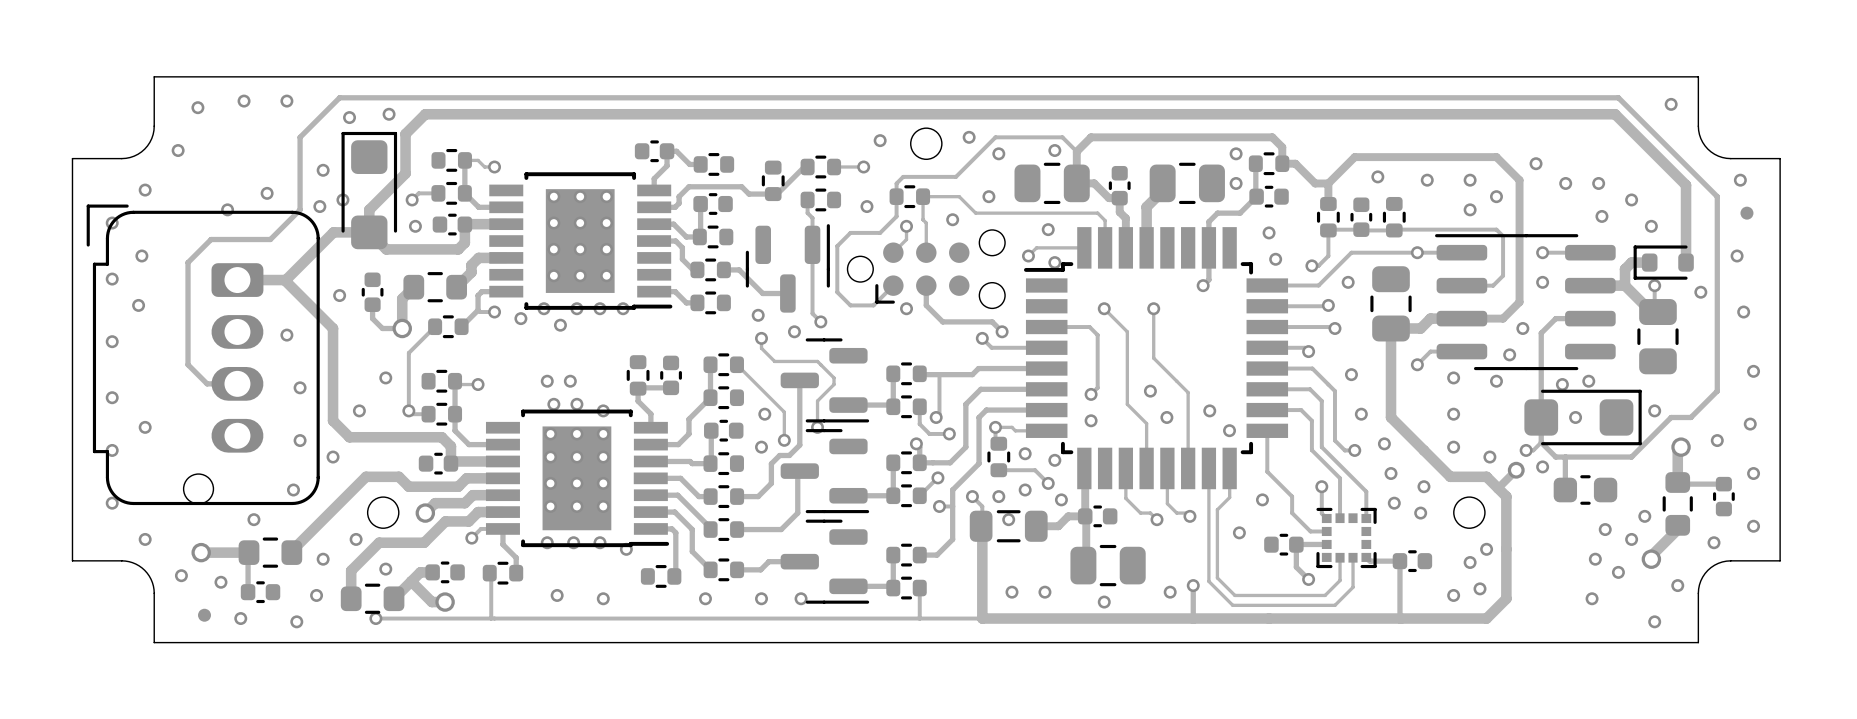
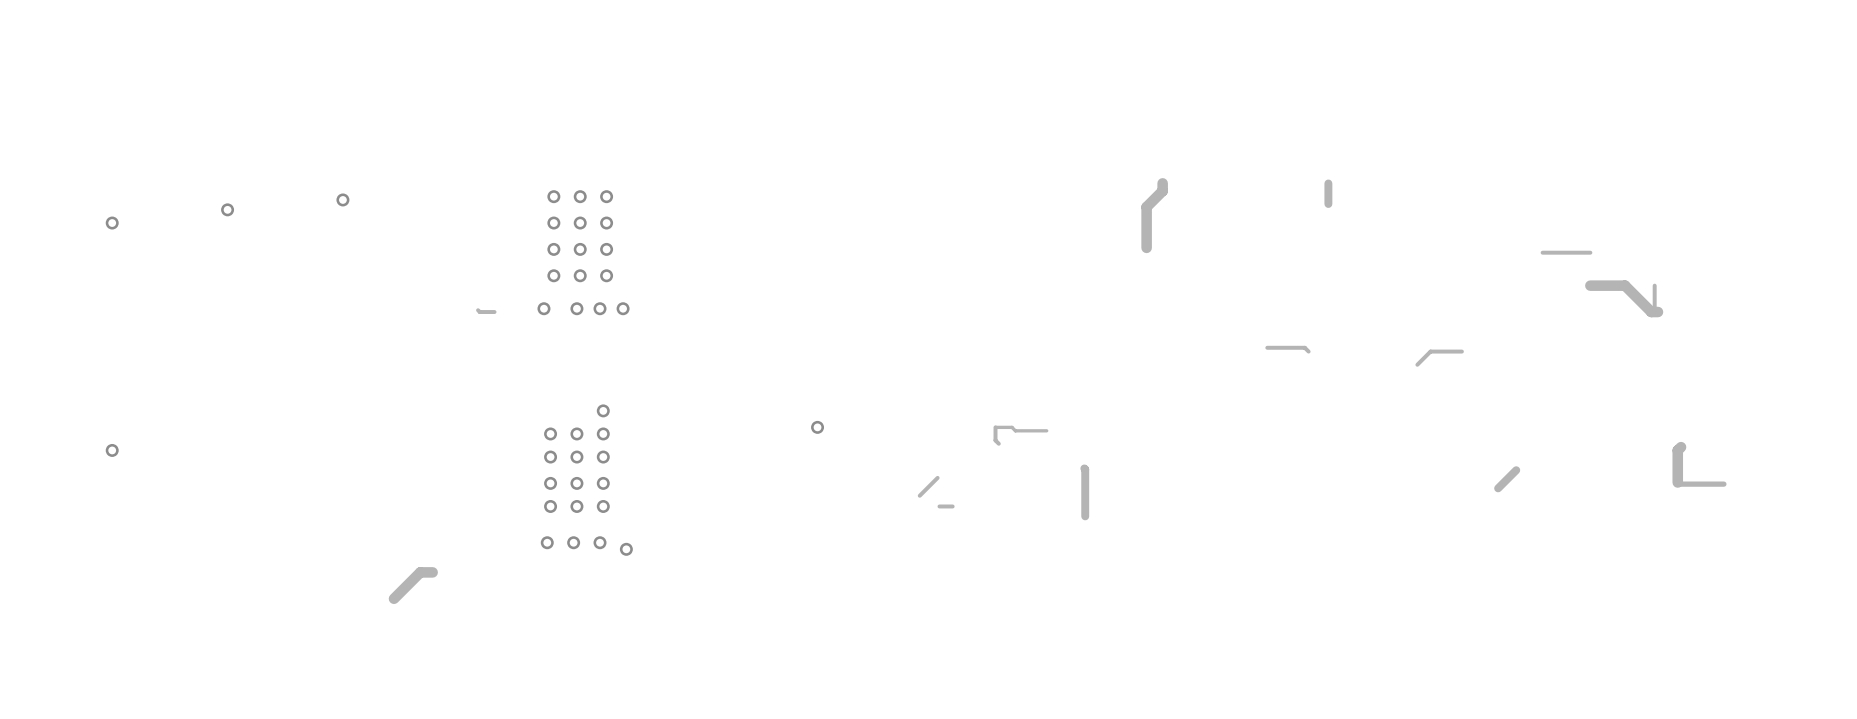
board edge: (1698, 76) (1698, 130) (1702, 142) (1707, 149) (1714, 154) (1726, 158) (1780, 158) (1780, 560) (1726, 561) (1714, 565) (1707, 570) (1702, 577) (1698, 589) (1698, 642) (154, 642) (154, 589) (151, 579) (144, 570) (135, 564) (125, 561) (72, 560) (72, 158) (126, 158) (134, 156) (144, 149) (151, 138) (153, 130) (154, 76) (1698, 76) -> none
via: (244, 101) -> none
via: (286, 101) -> none
via: (1671, 104) -> none
via: (197, 107) -> none
via: (389, 114) -> none
via: (349, 117) -> none
round board edge: [910, 128, 942, 160] -> none
via: (969, 137) -> none
via: (880, 140) -> none
via: (178, 150) -> none
via: (1054, 150) -> none
part: (654, 151) -> none
track: (1076, 151) (1091, 137) (1272, 137) (1282, 147) (1282, 163) (1295, 163) (1315, 183) (1328, 183) (1354, 157) (1496, 157) (1519, 180) (1519, 302) (1503, 318) (1430, 318) (1420, 328) (1391, 328) (1391, 417) (1450, 476) (1486, 476) (1506, 496) (1506, 598) (1486, 618) (982, 618) -> none
track: (1076, 151) (1076, 183) (1094, 183) (1109, 198) (1119, 198) (1119, 212) (1125, 218) (1125, 247) -> none
track: (1076, 151) (1062, 137) (995, 137) (955, 176) (903, 176) (896, 183) (896, 216) (880, 232) (850, 232) (837, 246) (837, 292) (850, 305) (873, 305) (893, 285) -> none
via: (998, 153) -> none
via: (1236, 153) -> none
part: (451, 160) -> none
track: (464, 160) (478, 160) (484, 167) (494, 167) -> none
track: (464, 160) (464, 193) (478, 207) (506, 207) -> none
track: (1255, 163) (1256, 196) (1240, 213) (1217, 213) (1208, 221) (1208, 279) (1203, 285) -> none
part: (1269, 163) -> none
via: (1536, 163) -> none
track: (700, 164) (689, 164) (676, 151) (667, 151) (667, 165) (654, 178) (654, 190) -> none
part: (713, 164) -> none
via: (494, 167) -> none
track: (807, 167) (804, 167) (777, 194) (749, 194) (741, 186) (688, 186) (679, 196) (679, 203) (675, 207) (654, 207) -> none
part: (820, 167) -> none
track: (863, 167) (834, 167) -> none
via: (863, 167) -> none
via: (323, 170) -> none
via: (1377, 176) -> none
part: (773, 180) -> none
via: (1427, 180) -> none
via: (1470, 180) -> none
via: (1740, 180) -> none
part: (1052, 183) -> none
part: (1187, 183) -> none
via: (1236, 183) -> none
via: (1565, 183) -> none
via: (1598, 183) -> none
part: (1119, 185) -> none
via: (145, 190) -> none
part: (369, 190) -> none
via: (267, 193) -> none
track: (438, 193) (418, 193) (412, 199) -> none
part: (451, 193) -> none
part: (909, 196) -> none
via: (988, 196) -> none
part: (1269, 196) -> none
via: (1496, 196) -> none
via: (412, 199) -> none
track: (807, 199) (807, 213) (812, 218) (812, 313) (820, 321) -> none
part: (820, 199) -> none
via: (1631, 199) -> none
track: (700, 204) (699, 236) (686, 236) (673, 224) (654, 224) -> none
part: (713, 204) -> none
via: (319, 206) -> none
via: (866, 206) -> none
via: (1470, 209) -> none
part: (1746, 213) -> none
via: (1601, 216) -> none
part: (1328, 217) -> none
part: (1361, 217) -> none
part: (1394, 217) -> none
via: (952, 219) -> none
part: (452, 224) -> none
track: (506, 224) (465, 224) (464, 242) (458, 249) (386, 249) (369, 232) -> none
via: (415, 226) -> none
track: (906, 226) (906, 239) (893, 252) -> none
via: (906, 226) -> none
via: (1651, 226) -> none
via: (1048, 229) -> none
track: (369, 232) (333, 232) (285, 280) (237, 280) -> none
track: (369, 232) (369, 209) (405, 173) (405, 134) (425, 114) (1615, 114) (1686, 185) (1686, 262) -> none
via: (1269, 232) -> none
part: (713, 236) -> none
part: (580, 241) -> none
track: (654, 241) (675, 241) (682, 247) (682, 259) (693, 269) (697, 269) -> none
track: (1084, 247) (1036, 247) (1028, 255) -> none
track: (1105, 247) (1105, 220) (1097, 213) (975, 213) (959, 196) (923, 196) (923, 219) (926, 223) (926, 252) -> none
via: (1417, 252) -> none
track: (1461, 252) (1351, 252) (1318, 285) (1267, 285) -> none
via: (1542, 252) -> none
via: (141, 255) -> none
via: (1028, 255) -> none
via: (1737, 255) -> none
track: (506, 257) (478, 257) (471, 265) (471, 272) (456, 287) -> none
via: (1275, 259) -> none
via: (1054, 262) -> none
track: (1649, 262) (1631, 262) (1625, 269) (1625, 285) -> none
part: (1663, 262) -> none
track: (1311, 265) (1318, 265) (1328, 255) (1329, 229) (1496, 229) (1503, 236) (1503, 275) (1493, 285) (1461, 285) -> none
via: (1311, 265) -> none
part: (787, 268) -> none
part: (710, 269) -> none
track: (723, 269) (739, 269) (762, 293) (787, 293) -> none
part: (926, 269) -> none
via: (112, 279) -> none
track: (284, 280) (333, 328) (333, 420) (349, 437) (441, 437) (450, 446) (450, 463) (453, 461) (502, 461) -> none
via: (1348, 282) -> none
via: (1542, 282) -> none
track: (926, 285) (926, 305) (942, 321) (992, 321) (1002, 331) -> none
via: (1203, 285) -> none
via: (1654, 285) -> none
track: (413, 287) (402, 298) (402, 328) (382, 328) (372, 318) (372, 304) -> none
part: (435, 287) -> none
track: (506, 291) (481, 291) (478, 295) (478, 310) (461, 326) -> none
track: (654, 291) (675, 291) (686, 302) (697, 302) -> none
part: (372, 292) -> none
via: (1700, 292) -> none
via: (339, 295) -> none
part: (710, 302) -> none
part: (1525, 302) -> none
part: (1391, 303) -> none
via: (138, 305) -> none
track: (1328, 305) (1267, 306) -> none
via: (1328, 305) -> none
via: (906, 308) -> none
track: (1104, 308) (1127, 331) (1127, 404) (1146, 423) (1146, 468) -> none
via: (1104, 308) -> none
track: (1153, 308) (1153, 358) (1188, 392) (1188, 468) -> none
via: (1153, 308) -> none
via: (494, 312) -> none
via: (1743, 312) -> none
via: (758, 315) -> none
via: (520, 318) -> none
track: (1590, 318) (1555, 318) (1541, 333) (1541, 442) -> none
via: (820, 321) -> none
via: (560, 325) -> none
track: (435, 326) (408, 353) (408, 410) (412, 414) (428, 414) -> none
part: (448, 326) -> none
track: (1046, 327) (1089, 327) (1097, 335) (1097, 387) (1091, 394) -> none
track: (1267, 327) (1334, 328) -> none
via: (402, 328) -> none
via: (1334, 328) -> none
via: (1522, 328) -> none
via: (794, 331) -> none
via: (1002, 331) -> none
via: (286, 335) -> none
part: (1657, 336) -> none
track: (761, 338) (761, 348) (774, 361) (817, 361) (834, 377) (834, 384) (817, 401) (817, 427) -> none
via: (761, 338) -> none
track: (982, 338) (991, 347) (1046, 347) -> none
via: (982, 338) -> none
via: (112, 341) -> none
via: (1308, 351) -> none
part: (203, 354) -> none
via: (1509, 354) -> none
part: (1156, 358) -> none
track: (710, 364) (710, 397) (688, 419) (688, 433) (678, 444) (650, 444) -> none
part: (723, 364) -> none
track: (736, 364) (784, 412) (784, 440) -> none
via: (1417, 364) -> none
track: (1046, 368) (978, 368) (972, 374) (919, 373) -> none
track: (1267, 368) (1312, 368) (1334, 391) (1334, 440) (1344, 450) (1354, 450) -> none
via: (1753, 371) -> none
track: (893, 373) (893, 406) (891, 405) (848, 405) -> none
part: (906, 373) -> none
track: (939, 374) (939, 414) (936, 417) -> none
via: (1351, 374) -> none
part: (638, 375) -> none
part: (671, 375) -> none
via: (385, 377) -> none
via: (1453, 377) -> none
track: (799, 380) (799, 445) (789, 455) (779, 455) (771, 463) (771, 483) (758, 496) (737, 496) -> none
part: (824, 380) -> none
part: (441, 381) -> none
via: (547, 381) -> none
via: (570, 381) -> none
via: (1496, 381) -> none
via: (1588, 381) -> none
track: (237, 383) (207, 383) (188, 364) (188, 262) (211, 239) (270, 239) (300, 209) (300, 137) (339, 97) (1618, 97) (1717, 196) (1717, 391) (1690, 417) (1671, 417) (1631, 457) (1555, 457) (1541, 442) -> none
track: (478, 384) (458, 384) (455, 381) (455, 430) (468, 444) (502, 444) -> none
via: (478, 384) -> none
via: (1562, 384) -> none
via: (300, 387) -> none
track: (671, 387) (638, 388) (638, 401) (650, 413) (650, 427) -> none
track: (1046, 389) (980, 389) (965, 404) (965, 447) (950, 462) (919, 462) (919, 447) (916, 443) -> none
track: (1267, 389) (1310, 389) (1321, 401) (1321, 447) (1366, 491) (1366, 518) -> none
via: (1150, 391) -> none
via: (1091, 394) -> none
via: (112, 397) -> none
part: (723, 397) -> none
via: (553, 404) -> none
via: (576, 404) -> none
part: (906, 406) -> none
track: (919, 406) (919, 424) (929, 433) (949, 433) -> none
via: (359, 410) -> none
via: (408, 410) -> none
track: (1046, 410) (986, 410) (979, 417) (979, 463) (952, 489) (952, 539) (937, 555) (919, 555) -> none
via: (1209, 410) -> none
track: (1267, 410) (1301, 410) (1311, 420) (1311, 450) (1340, 478) (1340, 518) -> none
via: (1654, 410) -> none
part: (441, 414) -> none
via: (764, 414) -> none
via: (1361, 414) -> none
via: (1453, 414) -> none
via: (936, 417) -> none
via: (1166, 417) -> none
via: (1575, 417) -> none
part: (1583, 417) -> none
via: (1091, 420) -> none
via: (1750, 424) -> none
via: (145, 427) -> none
via: (995, 427) -> none
track: (711, 430) (710, 463) (650, 461) -> none
part: (723, 430) -> none
via: (1229, 430) -> none
track: (1267, 430) (1267, 471) (1292, 496) (1292, 513) (1310, 531) (1326, 531) -> none
via: (949, 433) -> none
via: (300, 440) -> none
via: (784, 440) -> none
via: (1717, 440) -> none
track: (1541, 442) (1533, 450) (1526, 450) -> none
via: (916, 443) -> none
via: (1384, 443) -> none
via: (761, 447) -> none
via: (1453, 447) -> none
via: (1681, 447) -> none
via: (1354, 450) -> none
via: (1526, 450) -> none
via: (1025, 453) -> none
part: (998, 456) -> none
via: (333, 457) -> none
via: (1489, 457) -> none
track: (1565, 457) (1565, 489) -> none
via: (1054, 460) -> none
track: (893, 462) (893, 495) (848, 495) -> none
part: (906, 462) -> none
part: (438, 463) -> none
part: (723, 463) -> none
via: (1542, 466) -> none
track: (1125, 468) (1125, 498) (1140, 513) (1150, 513) (1157, 519) -> none
track: (1167, 468) (1167, 503) (1176, 513) (1186, 513) (1189, 516) -> none
track: (1208, 468) (1208, 581) (1232, 605) (1334, 605) (1353, 587) (1353, 557) -> none
track: (1229, 468) (1229, 497) (1217, 509) (1217, 577) (1234, 595) (1325, 595) (1340, 580) (1340, 557) -> none
track: (998, 470) (1035, 470) (1048, 483) -> none
via: (1516, 470) -> none
track: (799, 471) (797, 473) (797, 513) (781, 529) (737, 529) -> none
part: (824, 471) -> none
via: (1391, 473) -> none
via: (1753, 473) -> none
via: (937, 477) -> none
track: (502, 478) (466, 478) (458, 486) (408, 486) (398, 476) (365, 476) (291, 552) -> none
part: (577, 478) -> none
track: (650, 478) (680, 478) (698, 496) (710, 496) -> none
via: (1048, 483) -> none
track: (1321, 486) (1321, 513) (1326, 518) -> none
via: (1321, 486) -> none
via: (1423, 486) -> none
via: (293, 489) -> none
via: (1025, 489) -> none
part: (1585, 490) -> none
track: (502, 495) (472, 495) (464, 503) (435, 503) (425, 513) -> none
track: (650, 495) (677, 495) (710, 529) -> none
part: (906, 495) -> none
round board edge: [367, 496, 399, 529] -> none
part: (723, 496) -> none
track: (972, 496) (982, 506) (982, 618) -> none
via: (972, 496) -> none
via: (998, 496) -> none
round board edge: [1453, 496, 1486, 529] -> none
part: (1723, 496) -> none
via: (1061, 499) -> none
via: (1262, 499) -> none
via: (112, 503) -> none
via: (1394, 503) -> none
part: (1677, 503) -> none
via: (939, 506) -> none
track: (502, 512) (478, 512) (468, 521) (445, 521) (424, 542) (379, 542) (351, 570) (351, 598) -> none
track: (650, 512) (674, 512) (692, 529) (692, 551) (710, 569) -> none
via: (425, 513) -> none
via: (1420, 513) -> none
part: (1097, 516) -> none
via: (1189, 516) -> none
via: (1644, 516) -> none
via: (253, 519) -> none
via: (1008, 519) -> none
via: (1157, 519) -> none
track: (1677, 525) (1677, 529) (1651, 555) (1651, 559) -> none
part: (1008, 526) -> none
track: (1036, 526) (1058, 526) (1068, 516) (1085, 516) (1086, 562) (1083, 565) -> none
via: (1753, 526) -> none
track: (650, 528) (671, 528) (675, 532) (674, 576) -> none
part: (723, 529) -> none
via: (1605, 529) -> none
via: (1239, 532) -> none
part: (1346, 537) -> none
track: (471, 538) (480, 528) (502, 528) (502, 544) (516, 557) (516, 573) -> none
via: (471, 538) -> none
via: (145, 539) -> none
via: (356, 539) -> none
via: (1631, 539) -> none
via: (1714, 542) -> none
part: (1283, 544) -> none
track: (1296, 544) (1296, 567) (1308, 579) -> none
track: (1326, 544) (1296, 544) -> none
via: (1486, 549) -> none
track: (201, 552) (249, 552) (248, 592) -> none
via: (201, 552) -> none
part: (270, 552) -> none
track: (893, 555) (893, 588) (891, 586) (848, 586) -> none
part: (906, 555) -> none
track: (1366, 557) (1370, 561) (1399, 561) (1400, 618) -> none
via: (323, 559) -> none
via: (1595, 559) -> none
via: (1651, 559) -> none
track: (799, 561) (768, 561) (760, 569) (737, 569) -> none
part: (824, 561) -> none
part: (1412, 561) -> none
via: (1470, 562) -> none
part: (1108, 565) -> none
via: (385, 569) -> none
part: (723, 569) -> none
part: (445, 572) -> none
via: (1618, 572) -> none
track: (489, 573) (491, 618) -> none
part: (502, 573) -> none
via: (181, 575) -> none
part: (661, 576) -> none
via: (1308, 579) -> none
track: (411, 581) (431, 602) (445, 602) -> none
via: (220, 582) -> none
track: (1193, 585) (1193, 618) -> none
via: (1193, 585) -> none
via: (1677, 585) -> none
part: (906, 588) -> none
track: (919, 588) (919, 618) -> none
via: (1480, 588) -> none
part: (260, 592) -> none
via: (1011, 592) -> none
via: (1044, 592) -> none
via: (1170, 592) -> none
via: (316, 595) -> none
via: (557, 595) -> none
via: (1453, 595) -> none
part: (372, 598) -> none
via: (603, 598) -> none
via: (705, 598) -> none
via: (761, 598) -> none
via: (801, 598) -> none
via: (1592, 598) -> none
via: (445, 602) -> none
via: (1104, 602) -> none
part: (204, 615) -> none
via: (240, 618) -> none
via: (375, 618) -> none
track: (982, 618) (375, 618) -> none
via: (296, 621) -> none
via: (1654, 621) -> none

